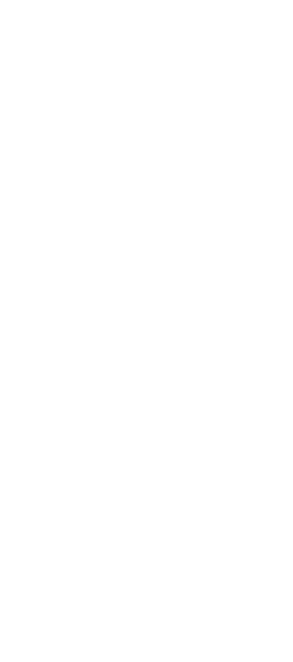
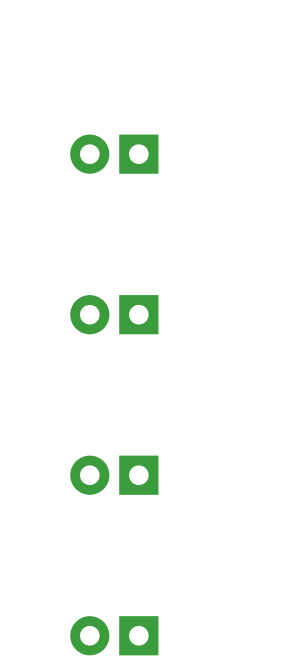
part: none -> (114, 154)
part: none -> (114, 314)
part: none -> (114, 475)
part: none -> (114, 635)

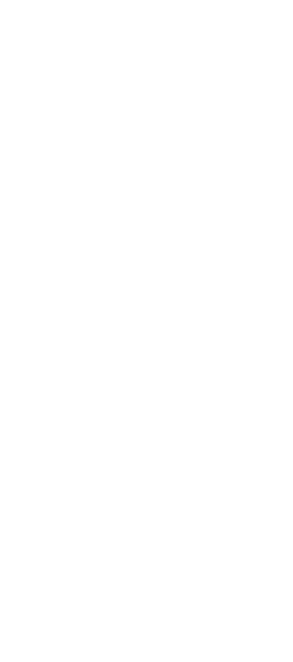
part: (114, 154) -> none
part: (114, 314) -> none
part: (114, 475) -> none
part: (114, 635) -> none

